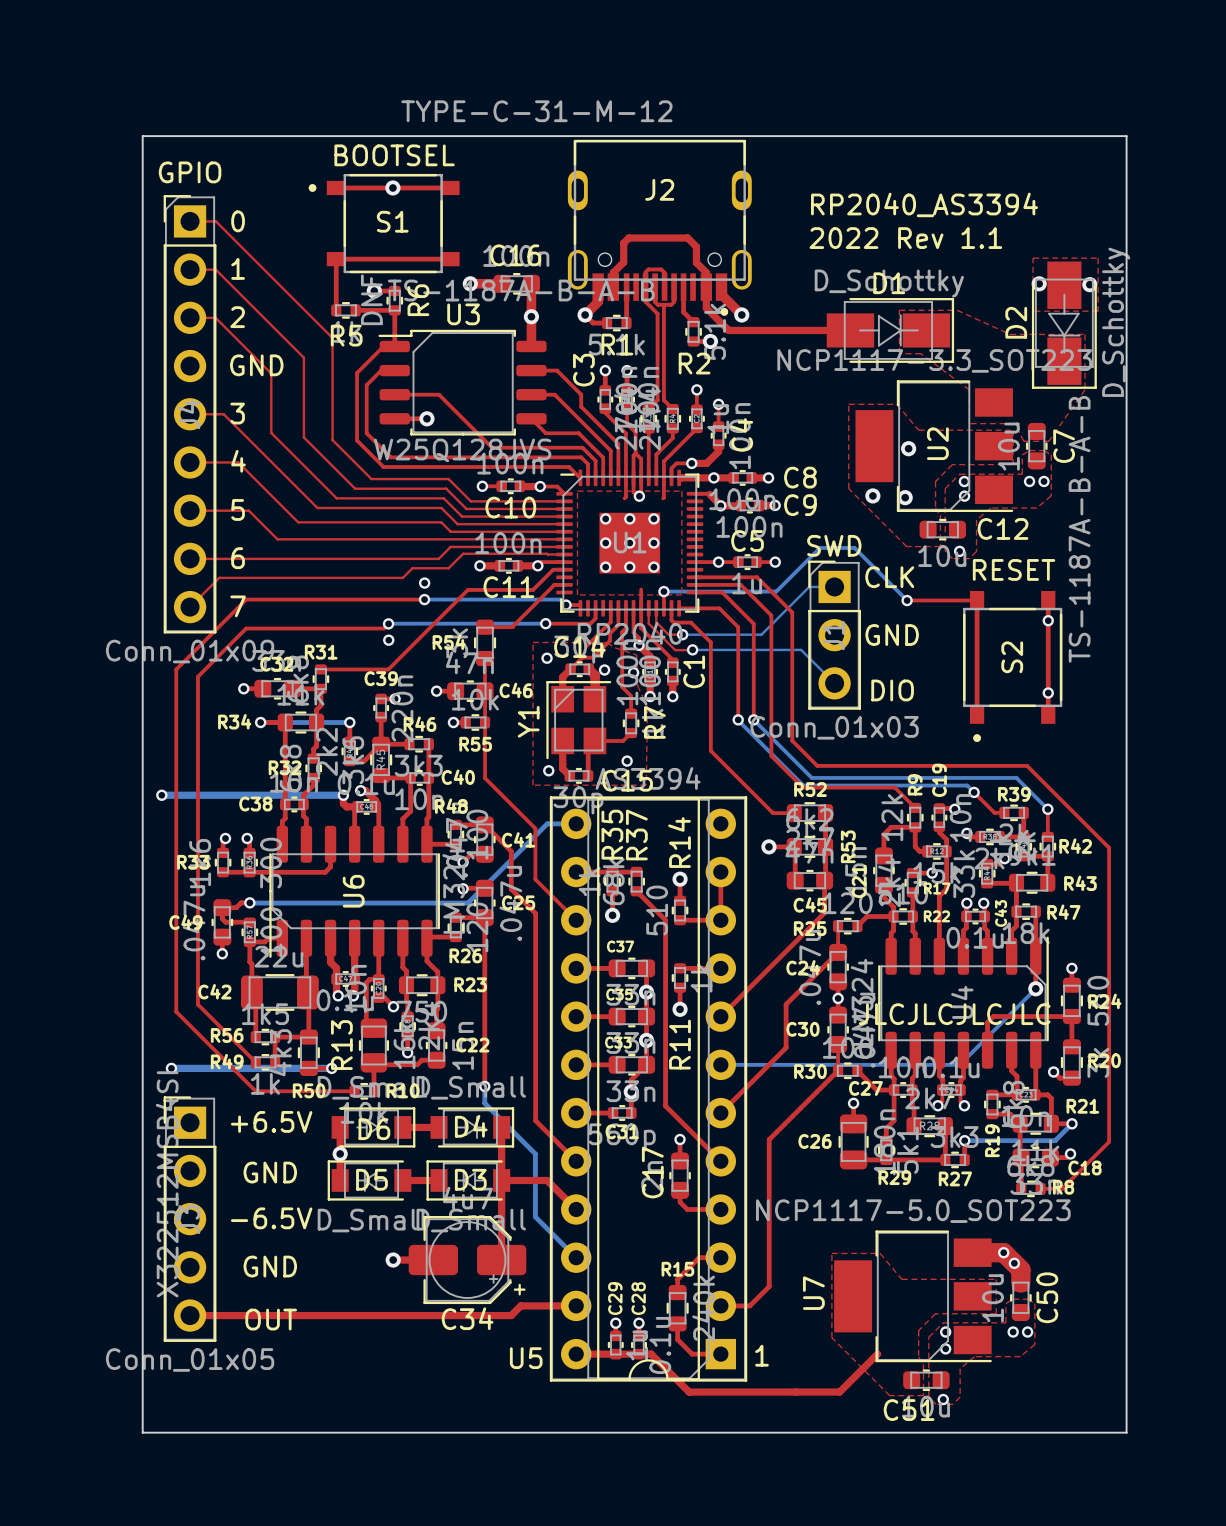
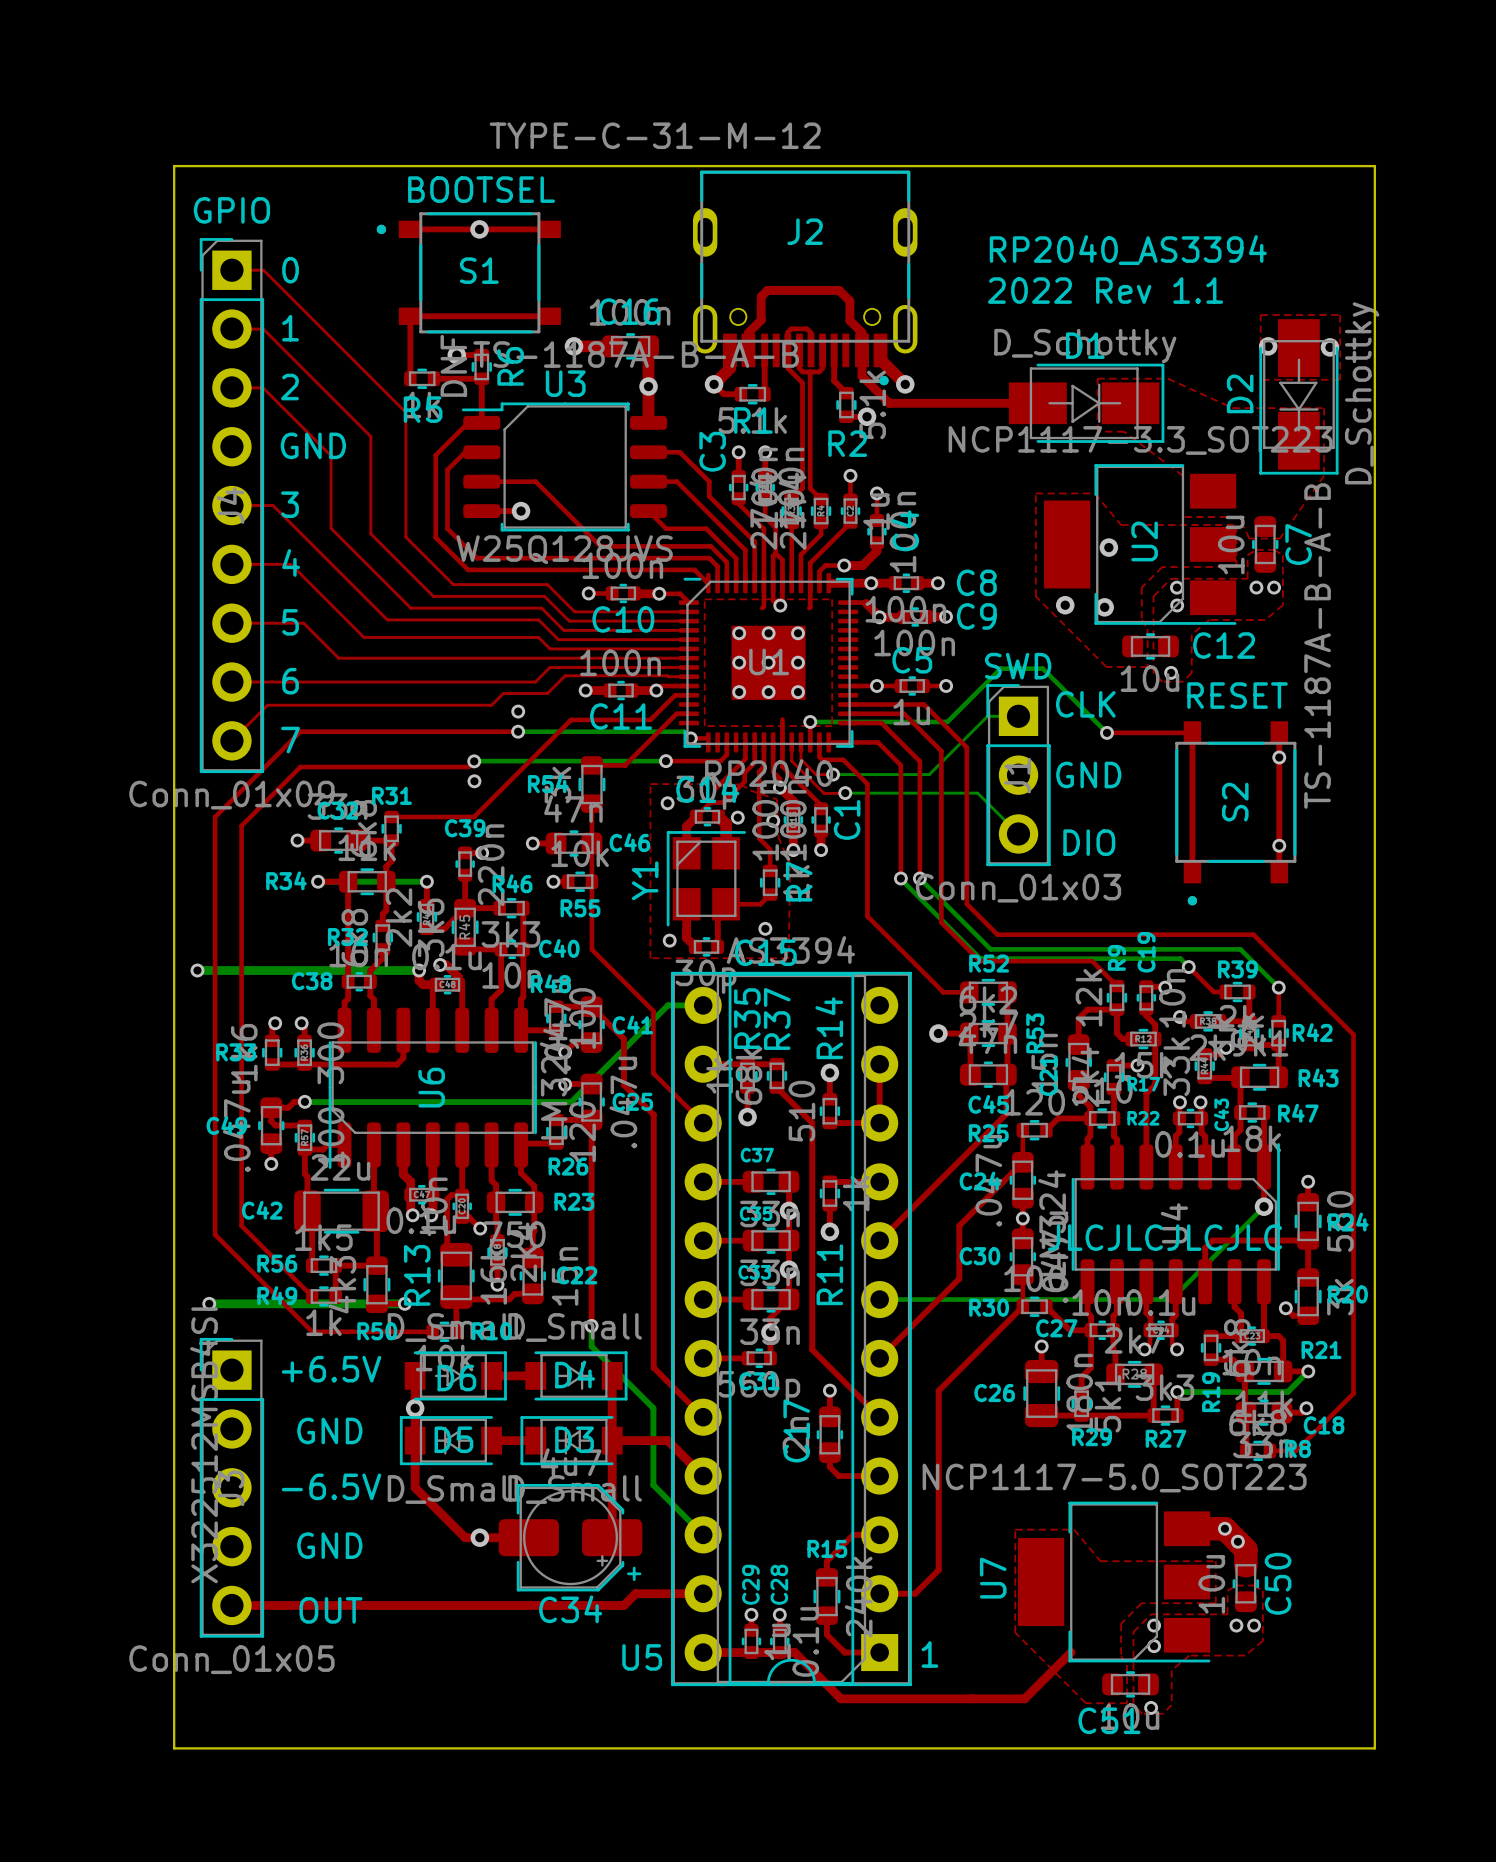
top track: none -> (415, 1440) (415, 1487) (465, 1537) (479, 1537)

